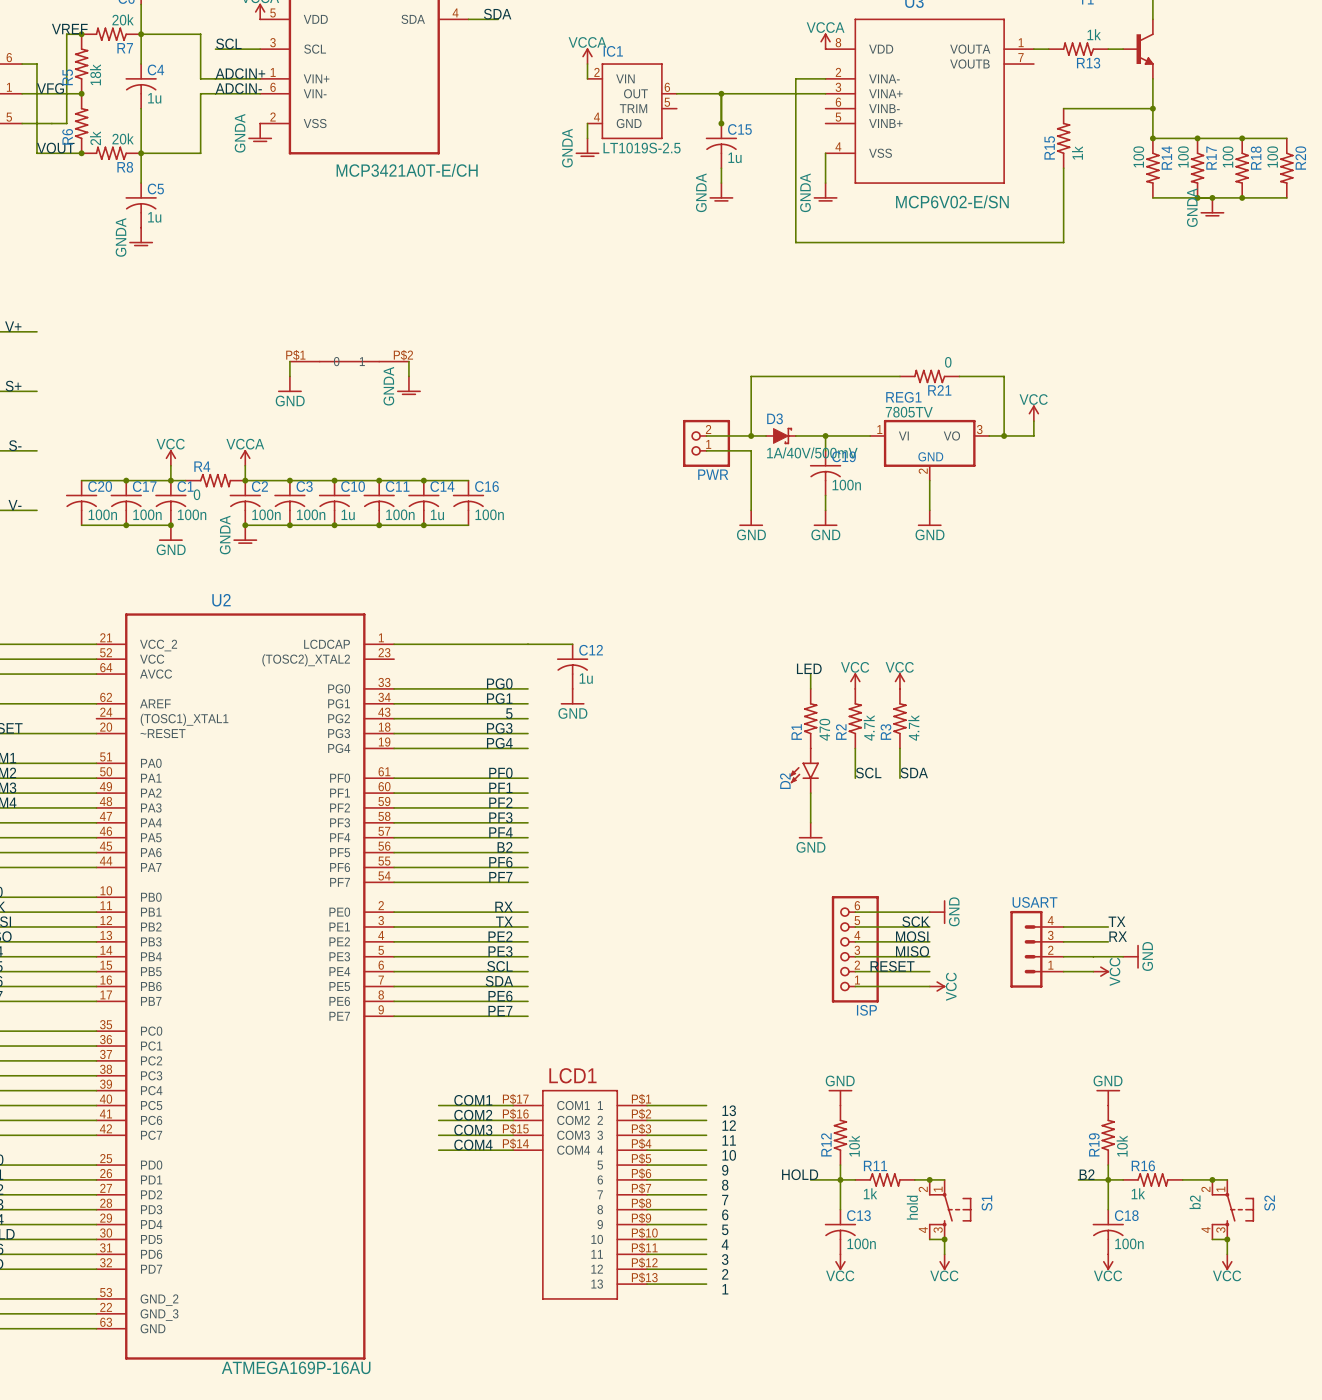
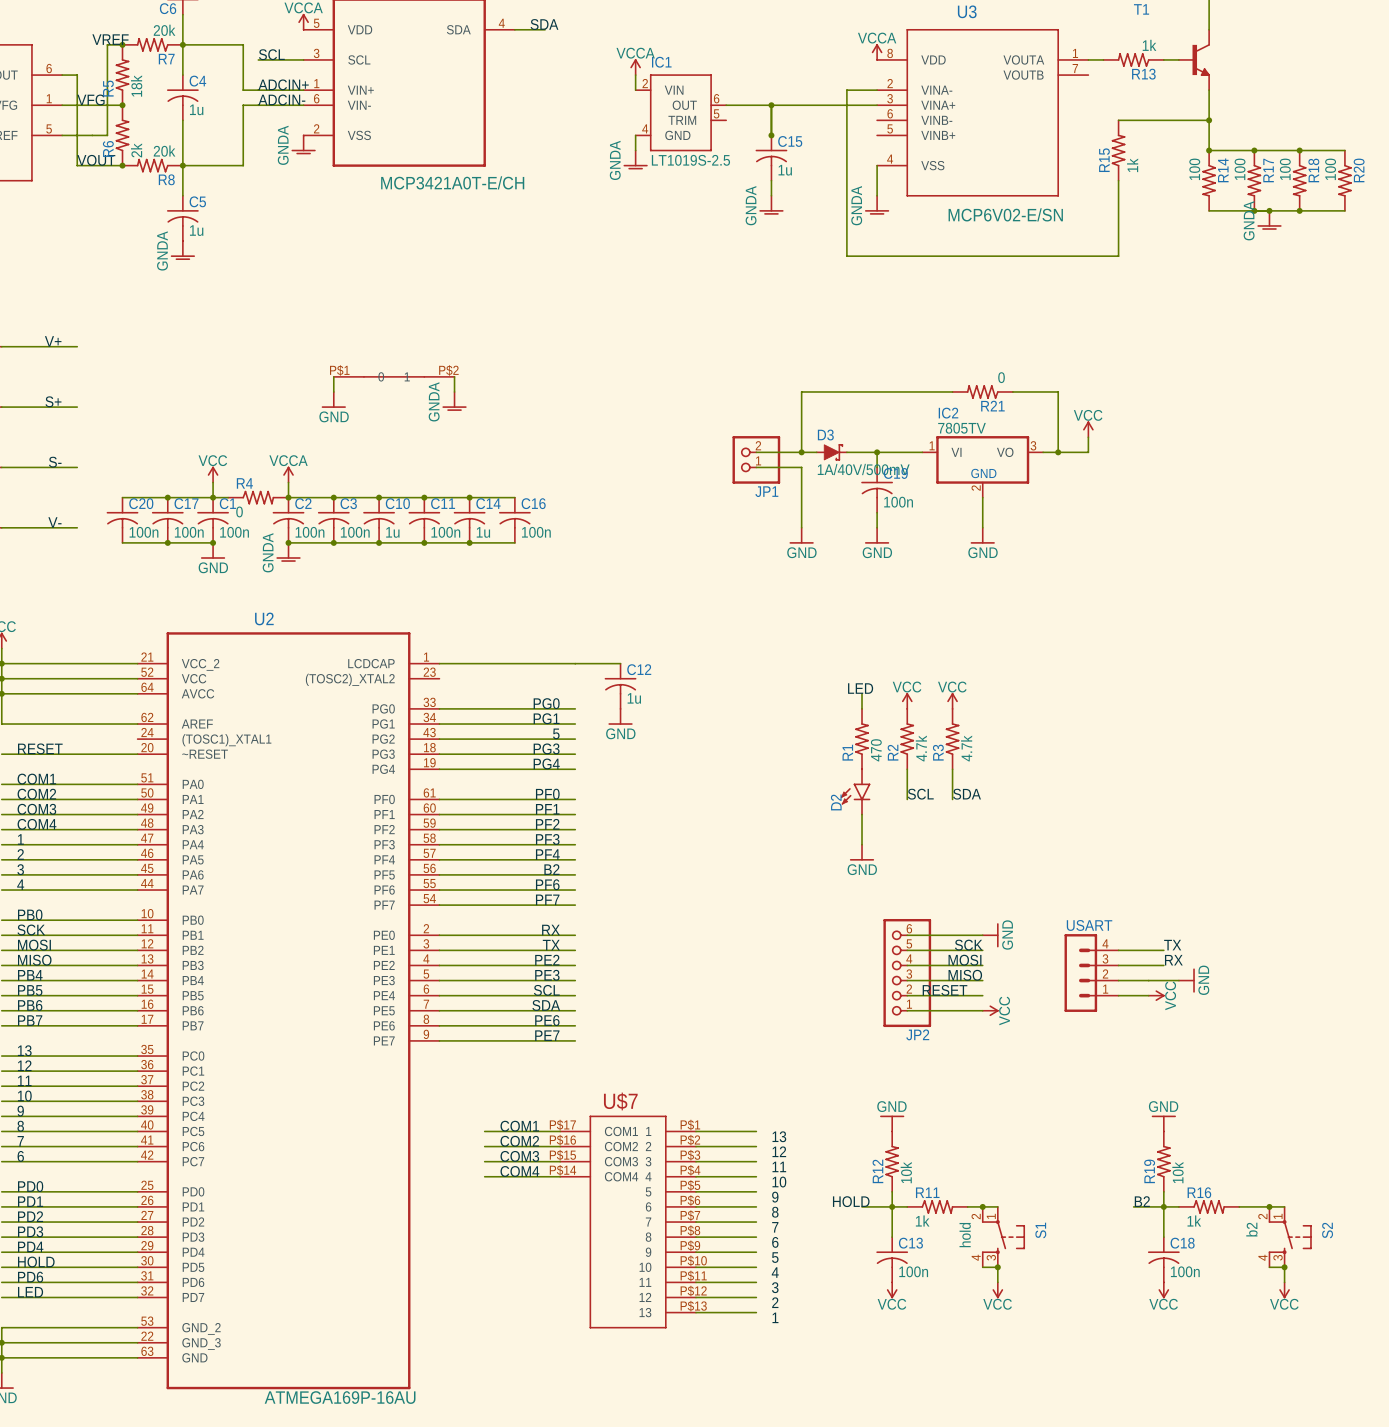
REG1 name: REG1 (903, 397) -> IC2 (948, 413)
PWR name: PWR (713, 474) -> JP1 (766, 491)
ISP name: ISP (866, 1010) -> JP2 (917, 1034)
LCD1 name: LCD1 (572, 1075) -> U$7 (620, 1101)

